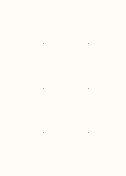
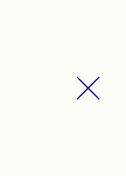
no-connect mark: none -> (88, 88)

